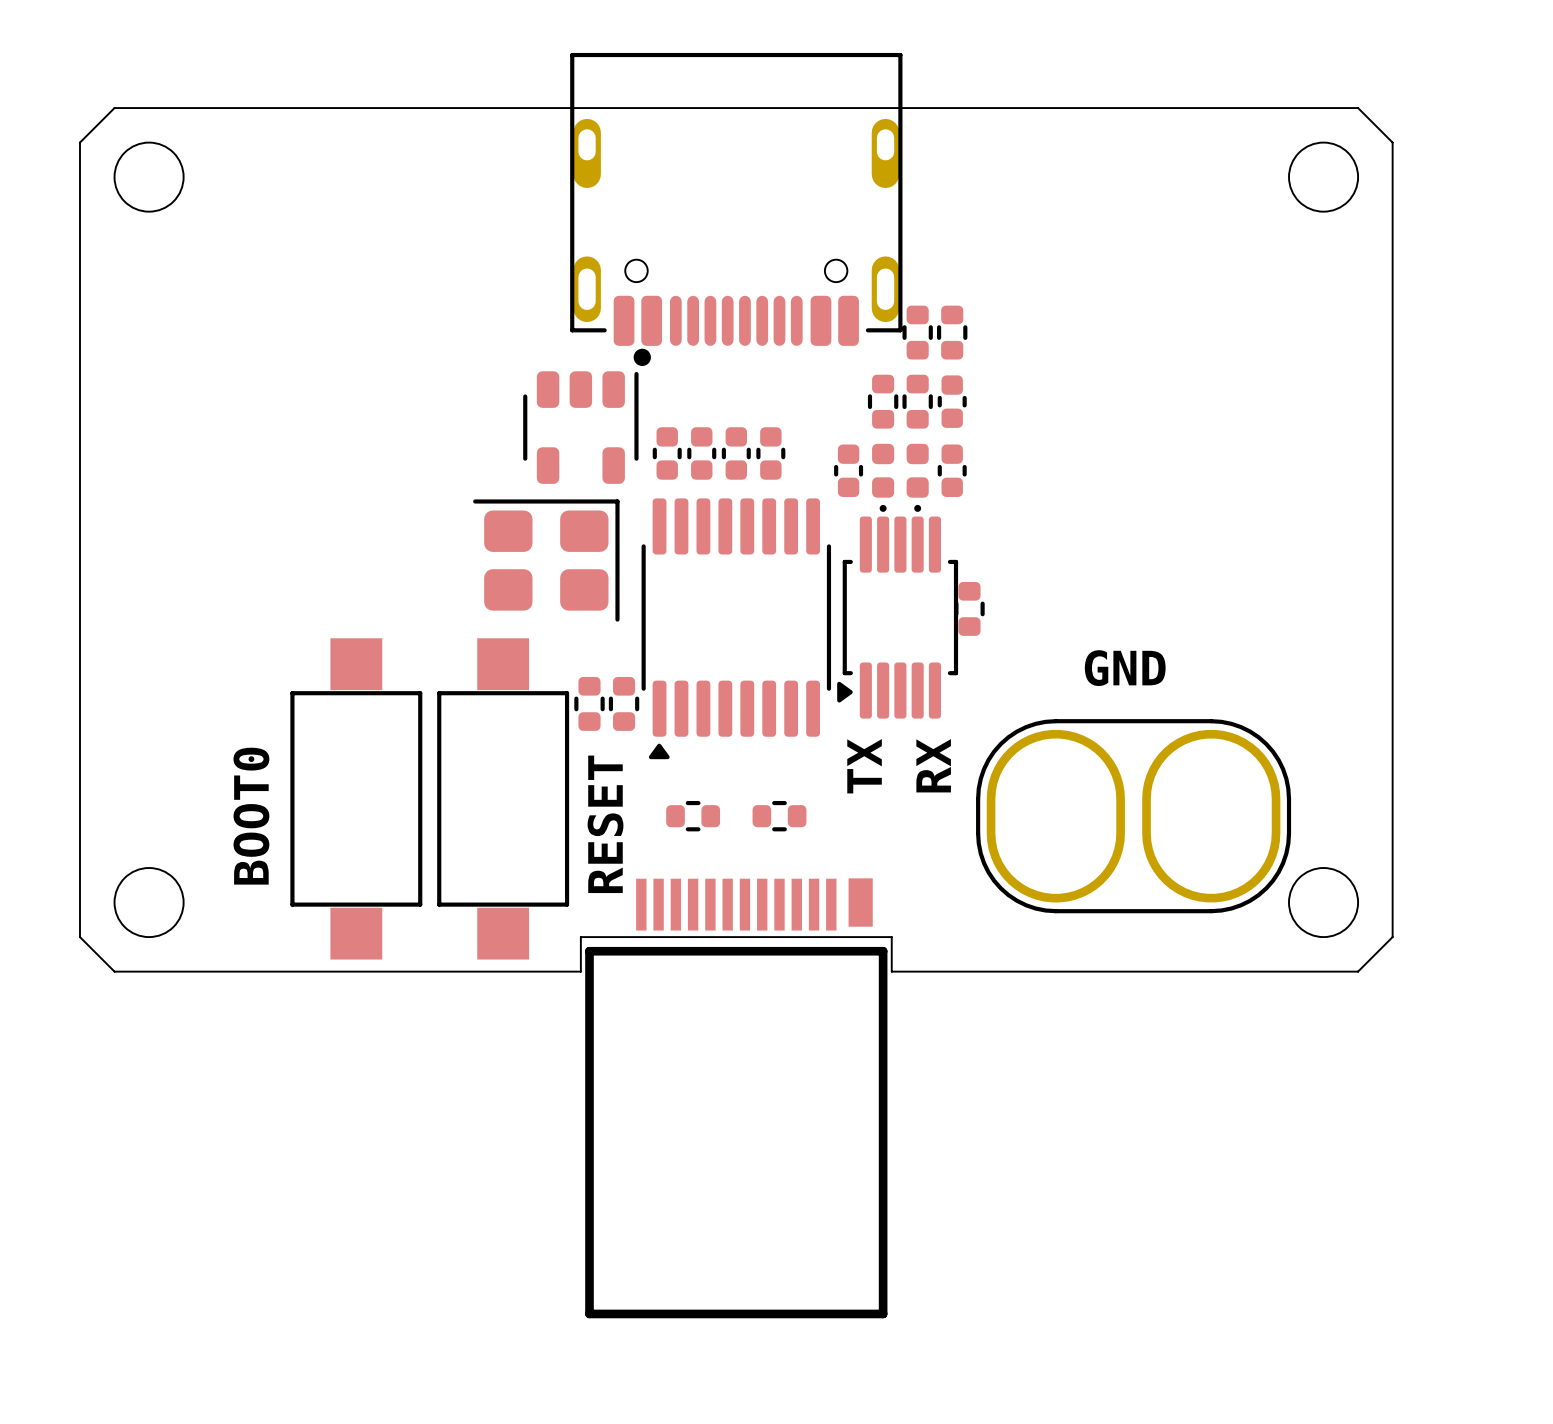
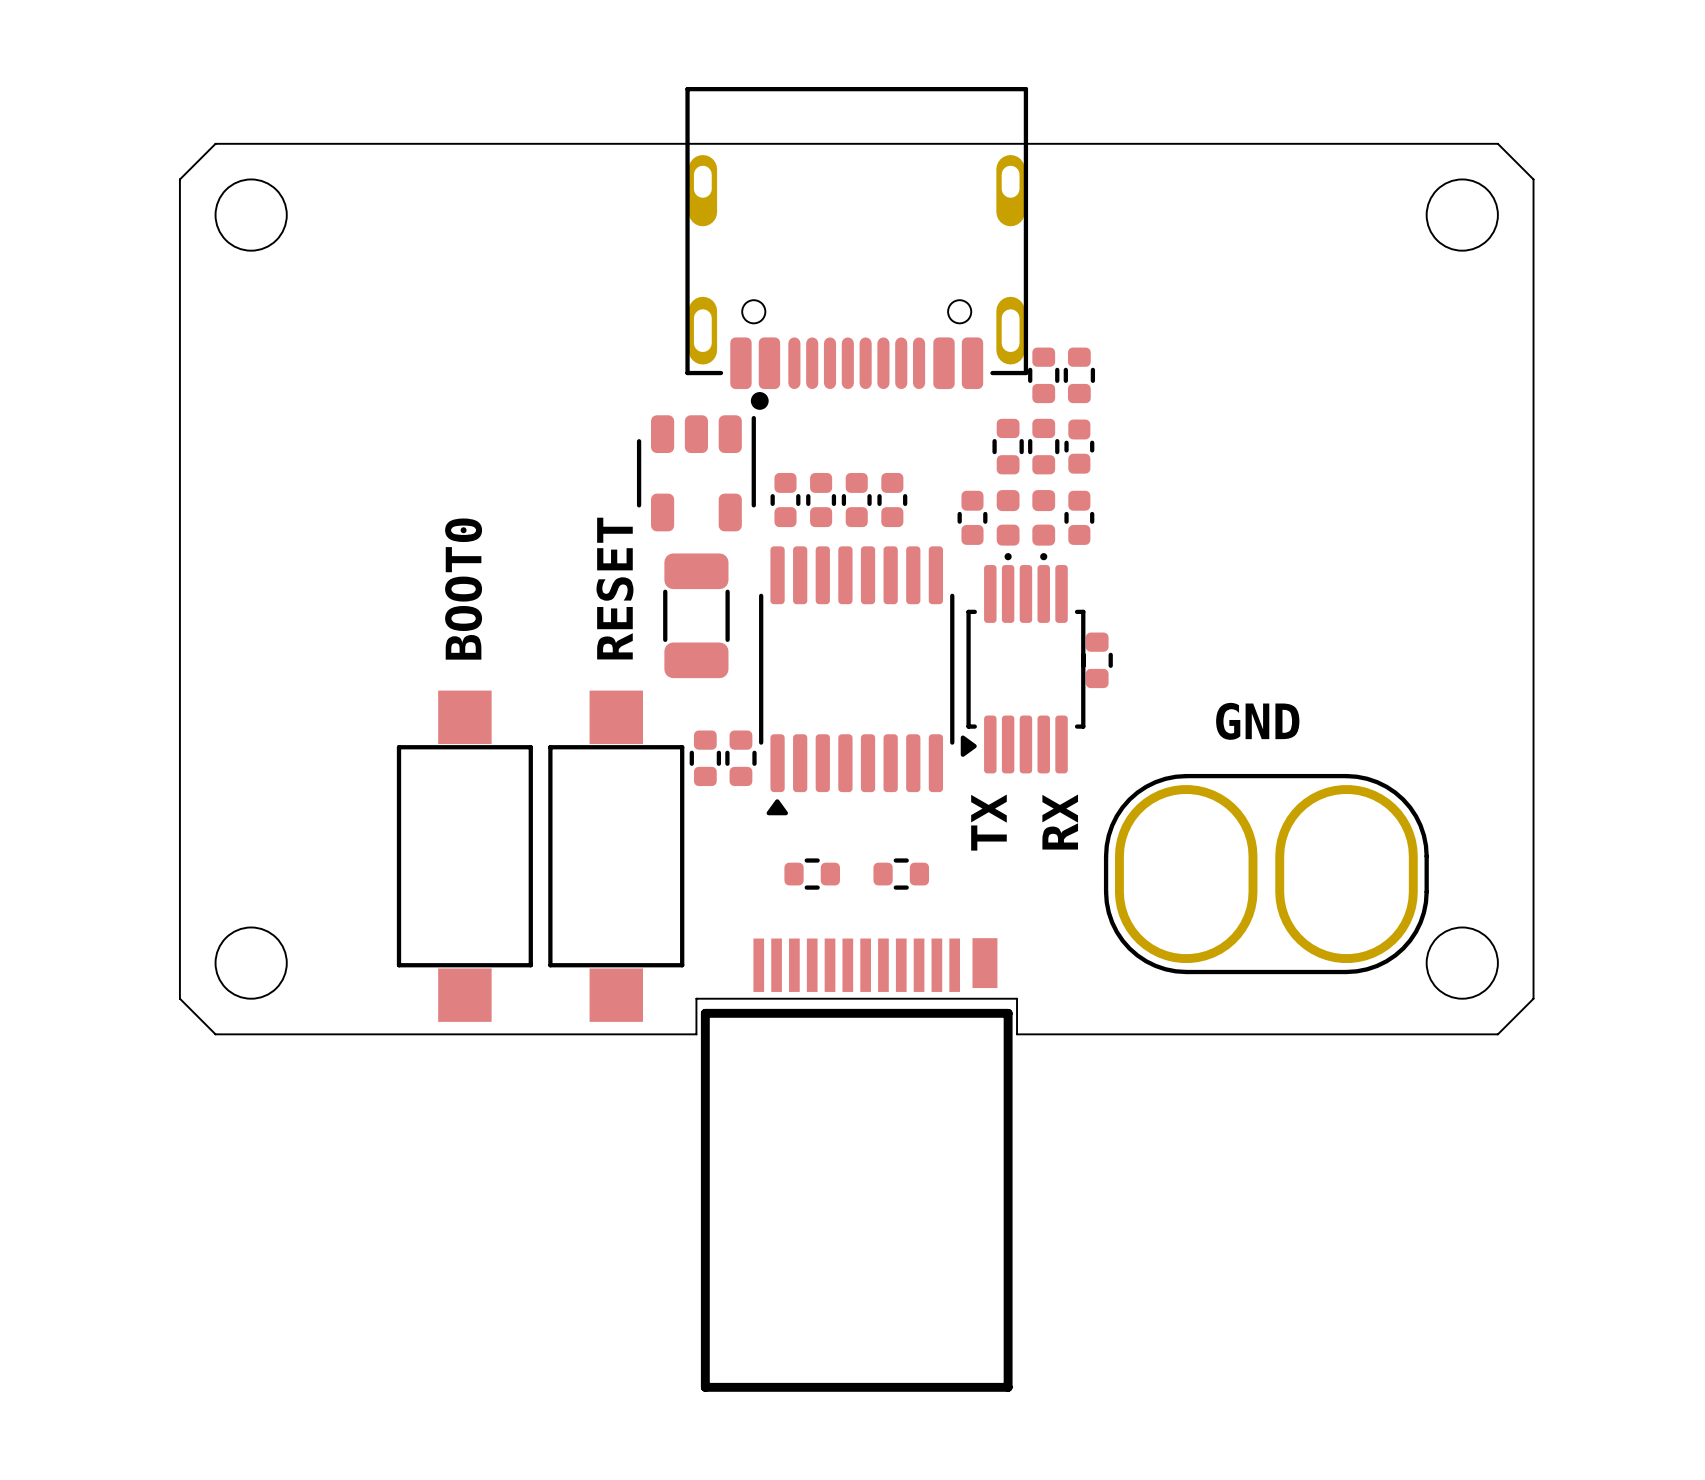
part: (546, 560) -> none
part: none -> (696, 615)
text position: BOOT0 (251, 816) -> BOOT0 (463, 589)
text position: RESET (605, 824) -> RESET (614, 588)

